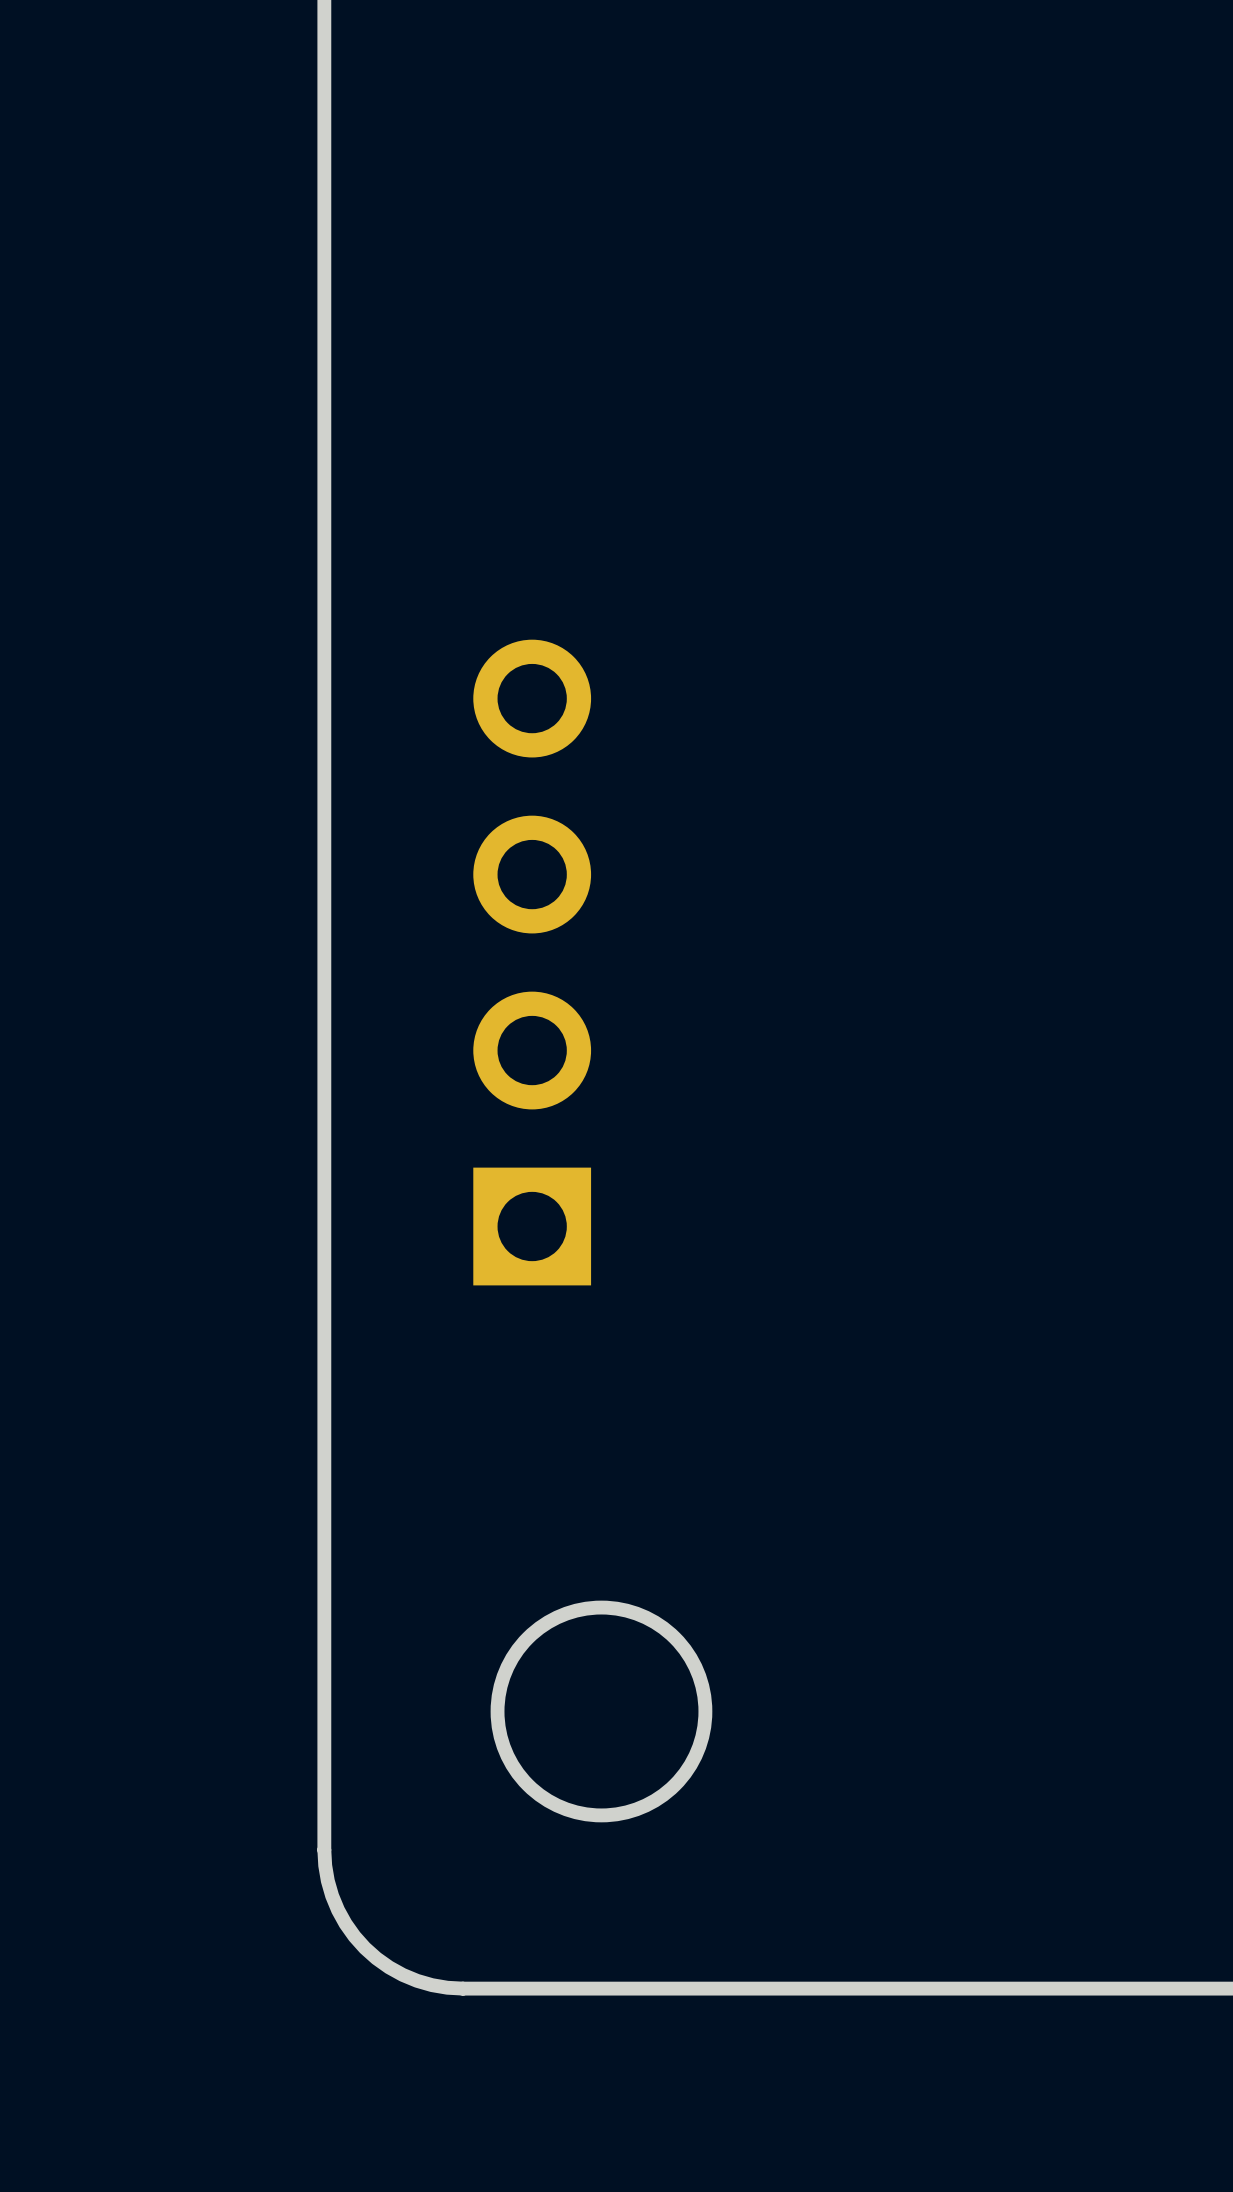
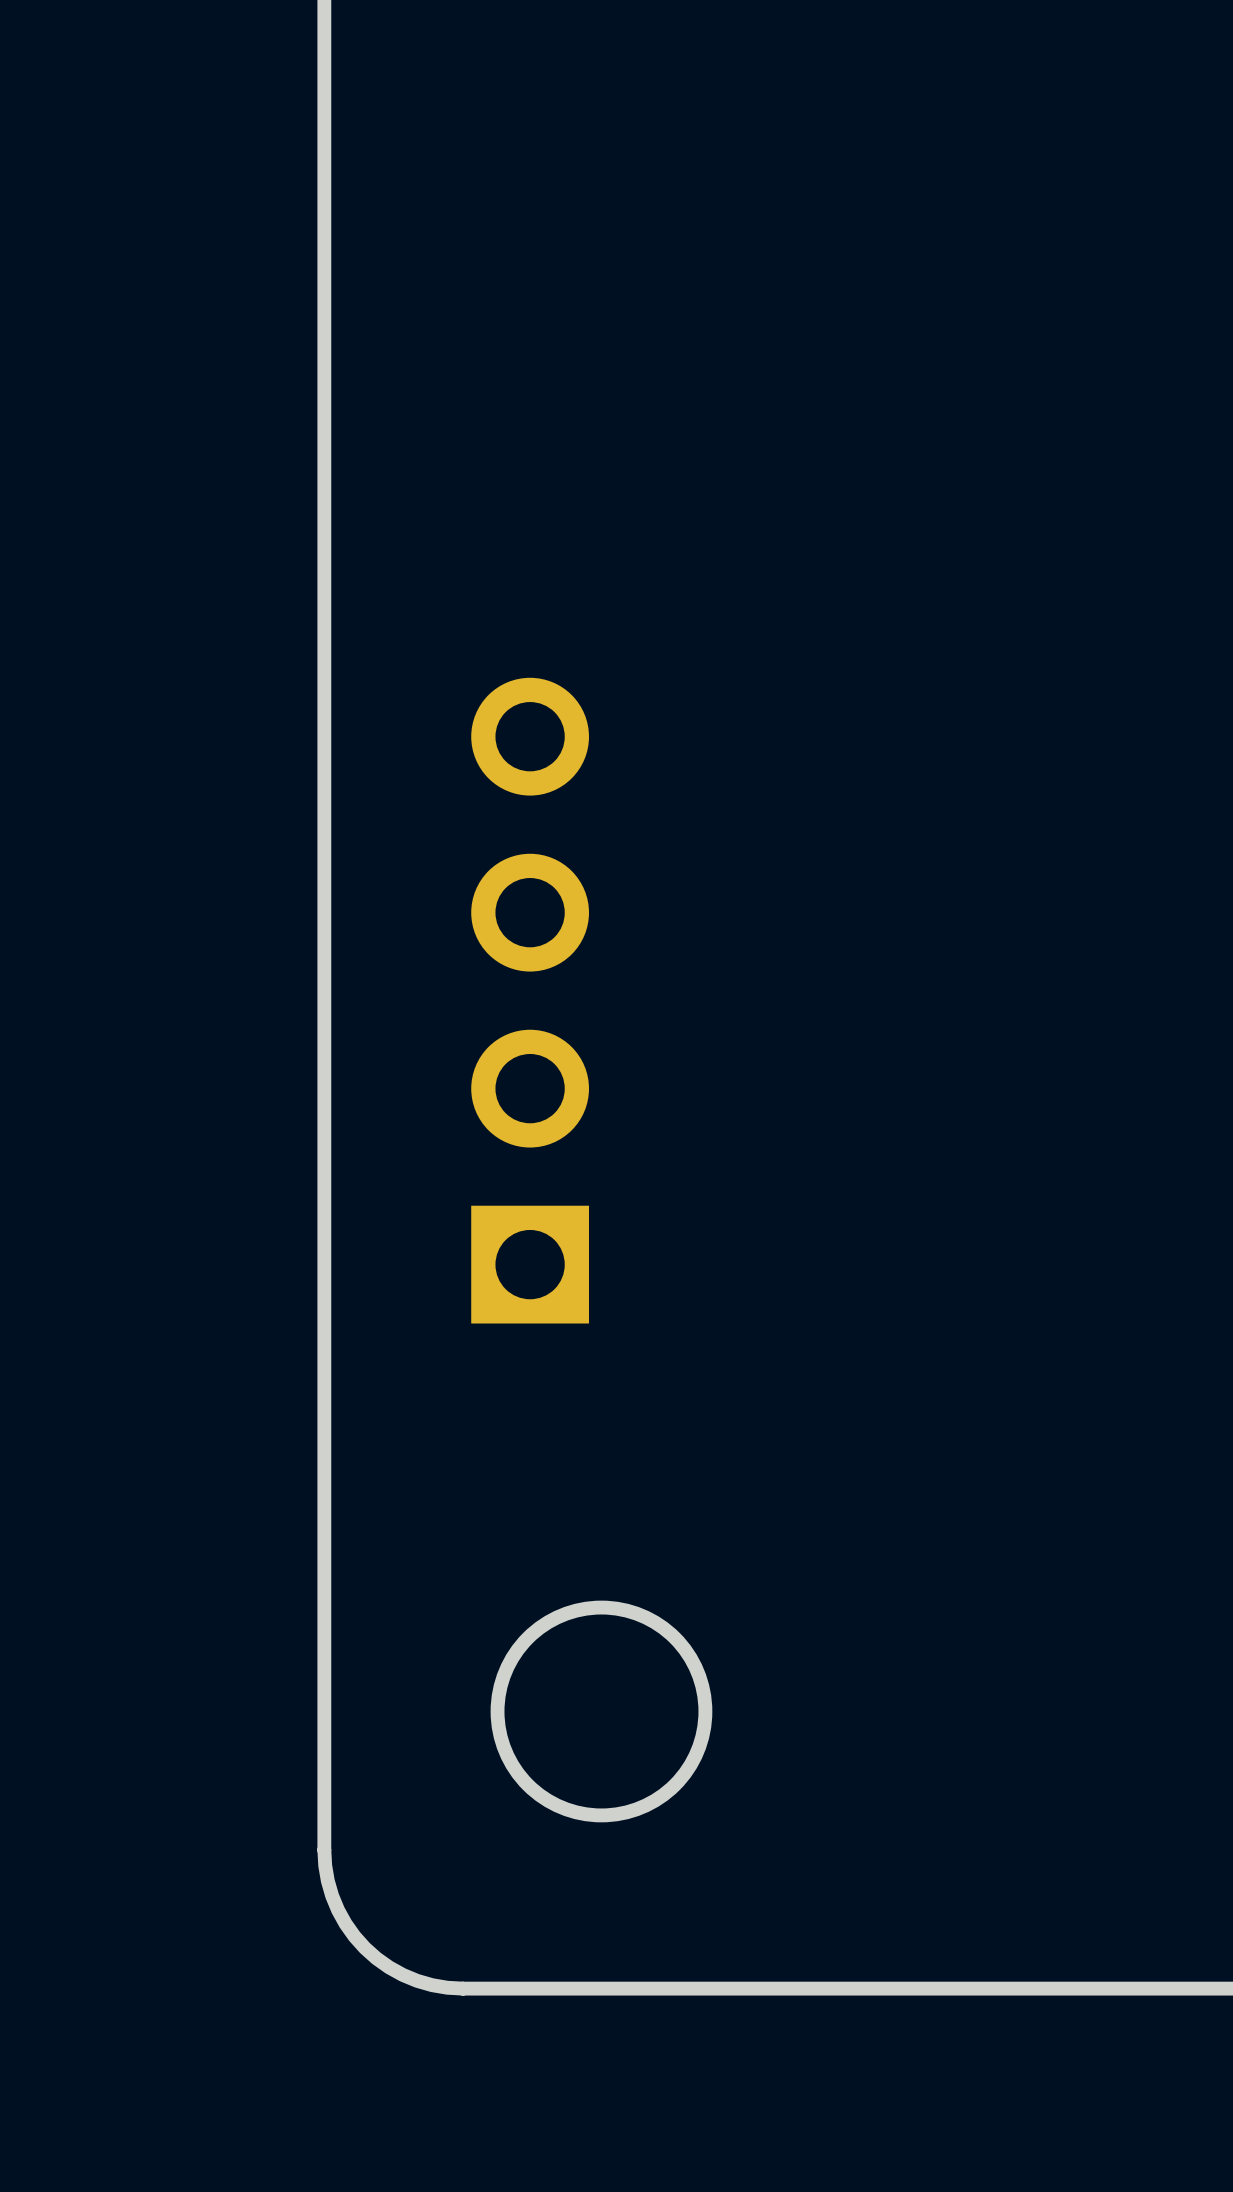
part position: (532, 962) -> (530, 1000)

